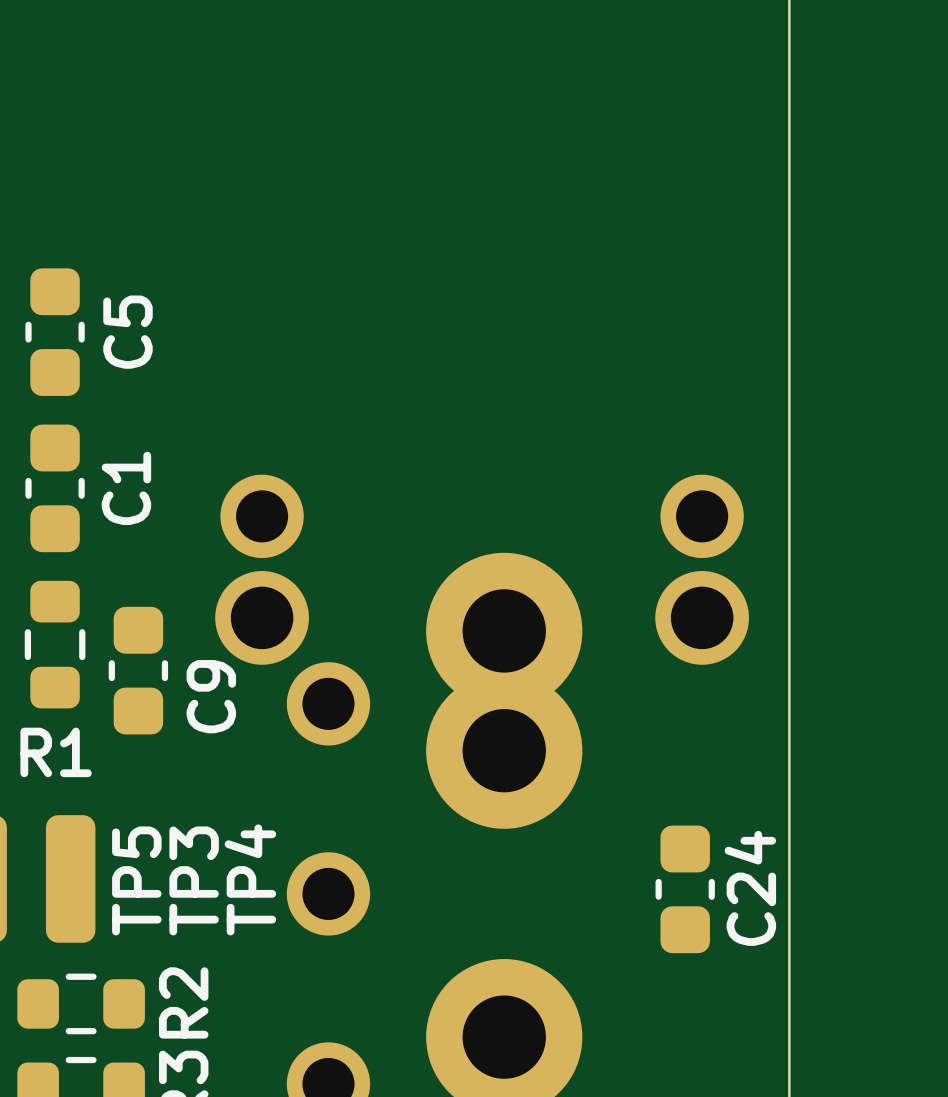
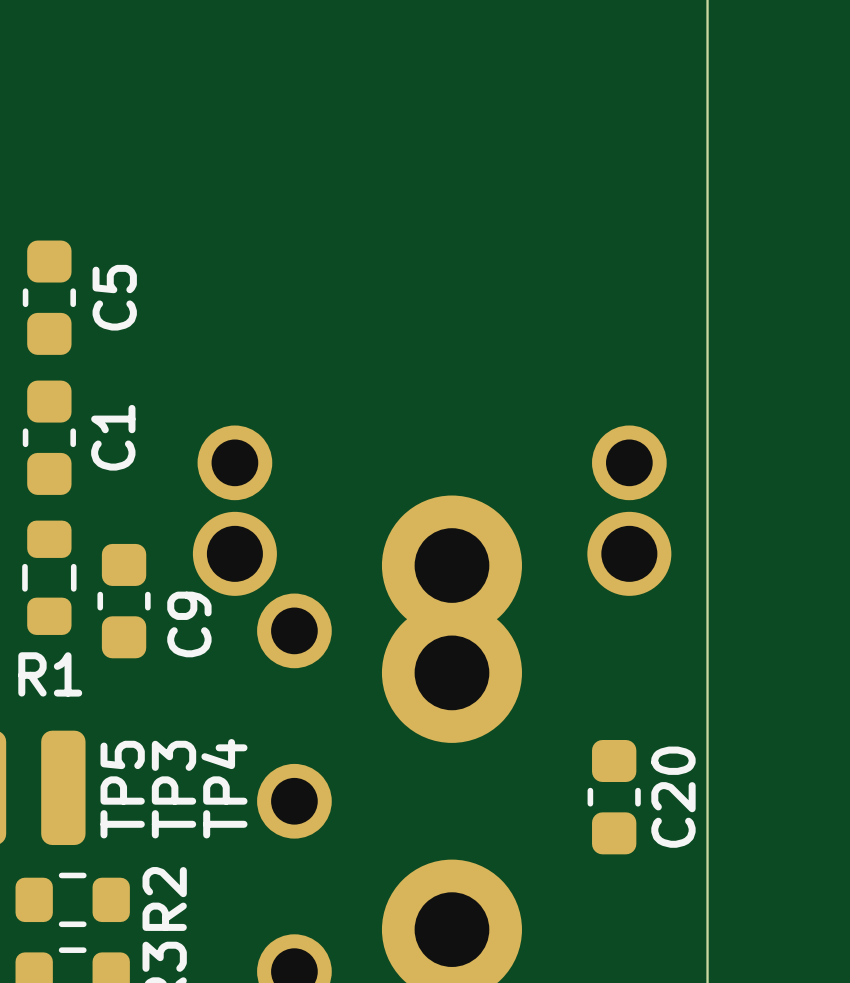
C24 name: C24 (750, 888) -> C20 (673, 797)

